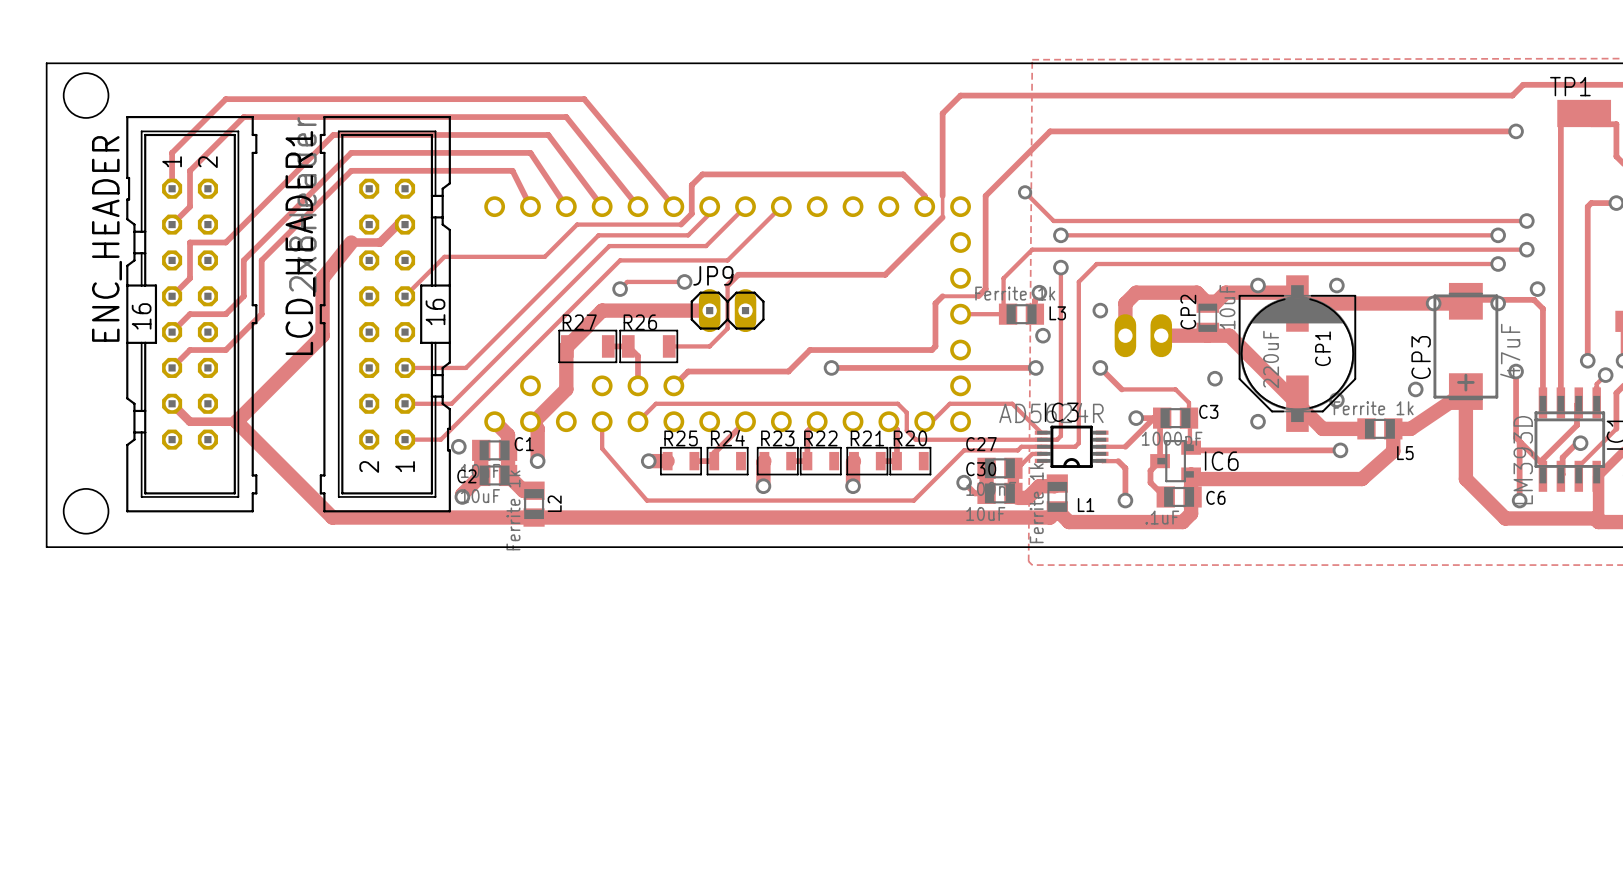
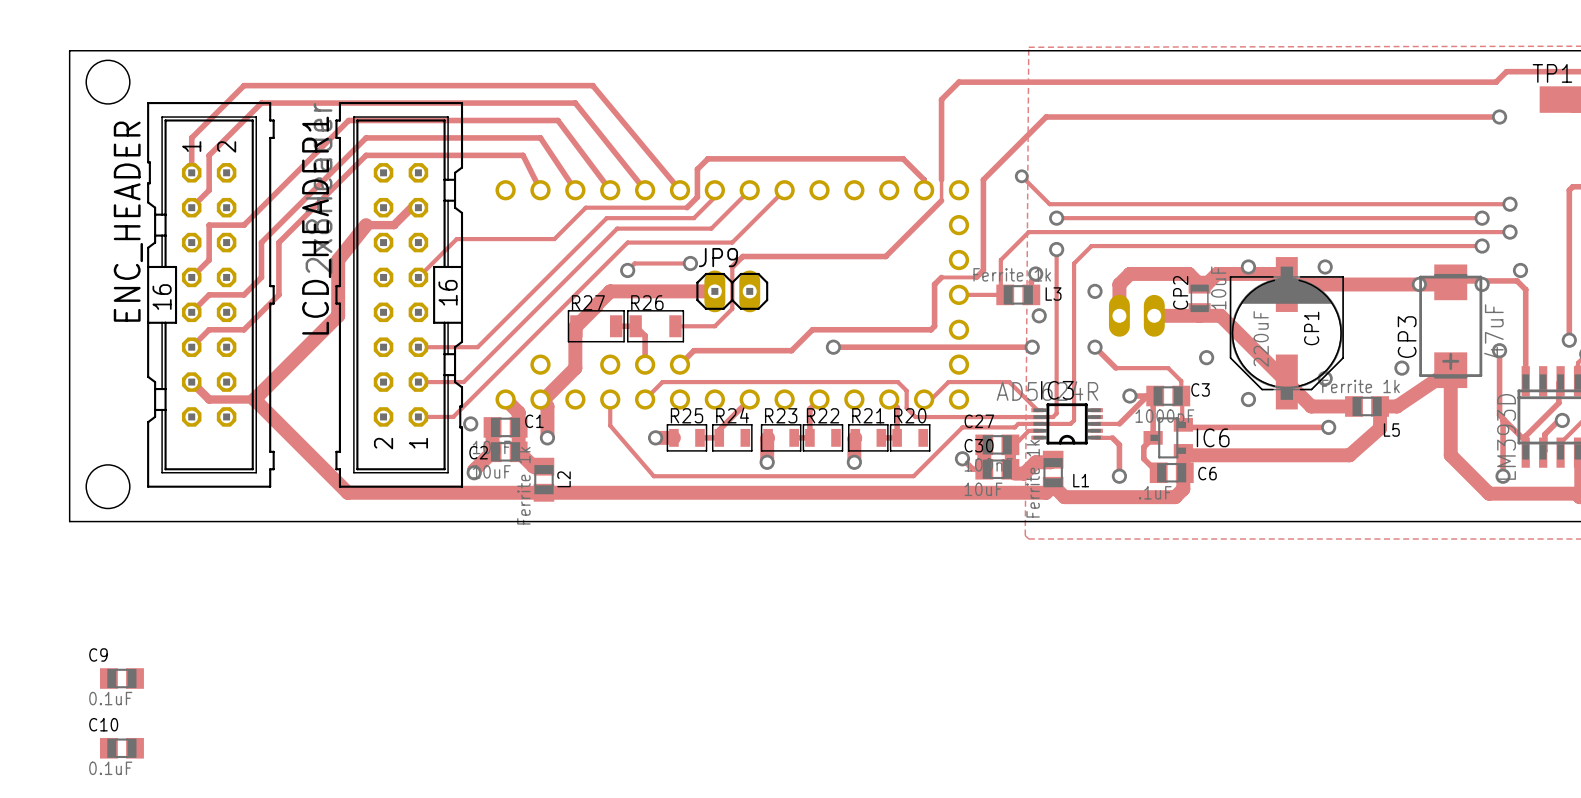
track: (1560, 118) (1560, 402) -> none
C9: none -> 0.1uF (121, 678)
C10: none -> 0.1uF (121, 748)

